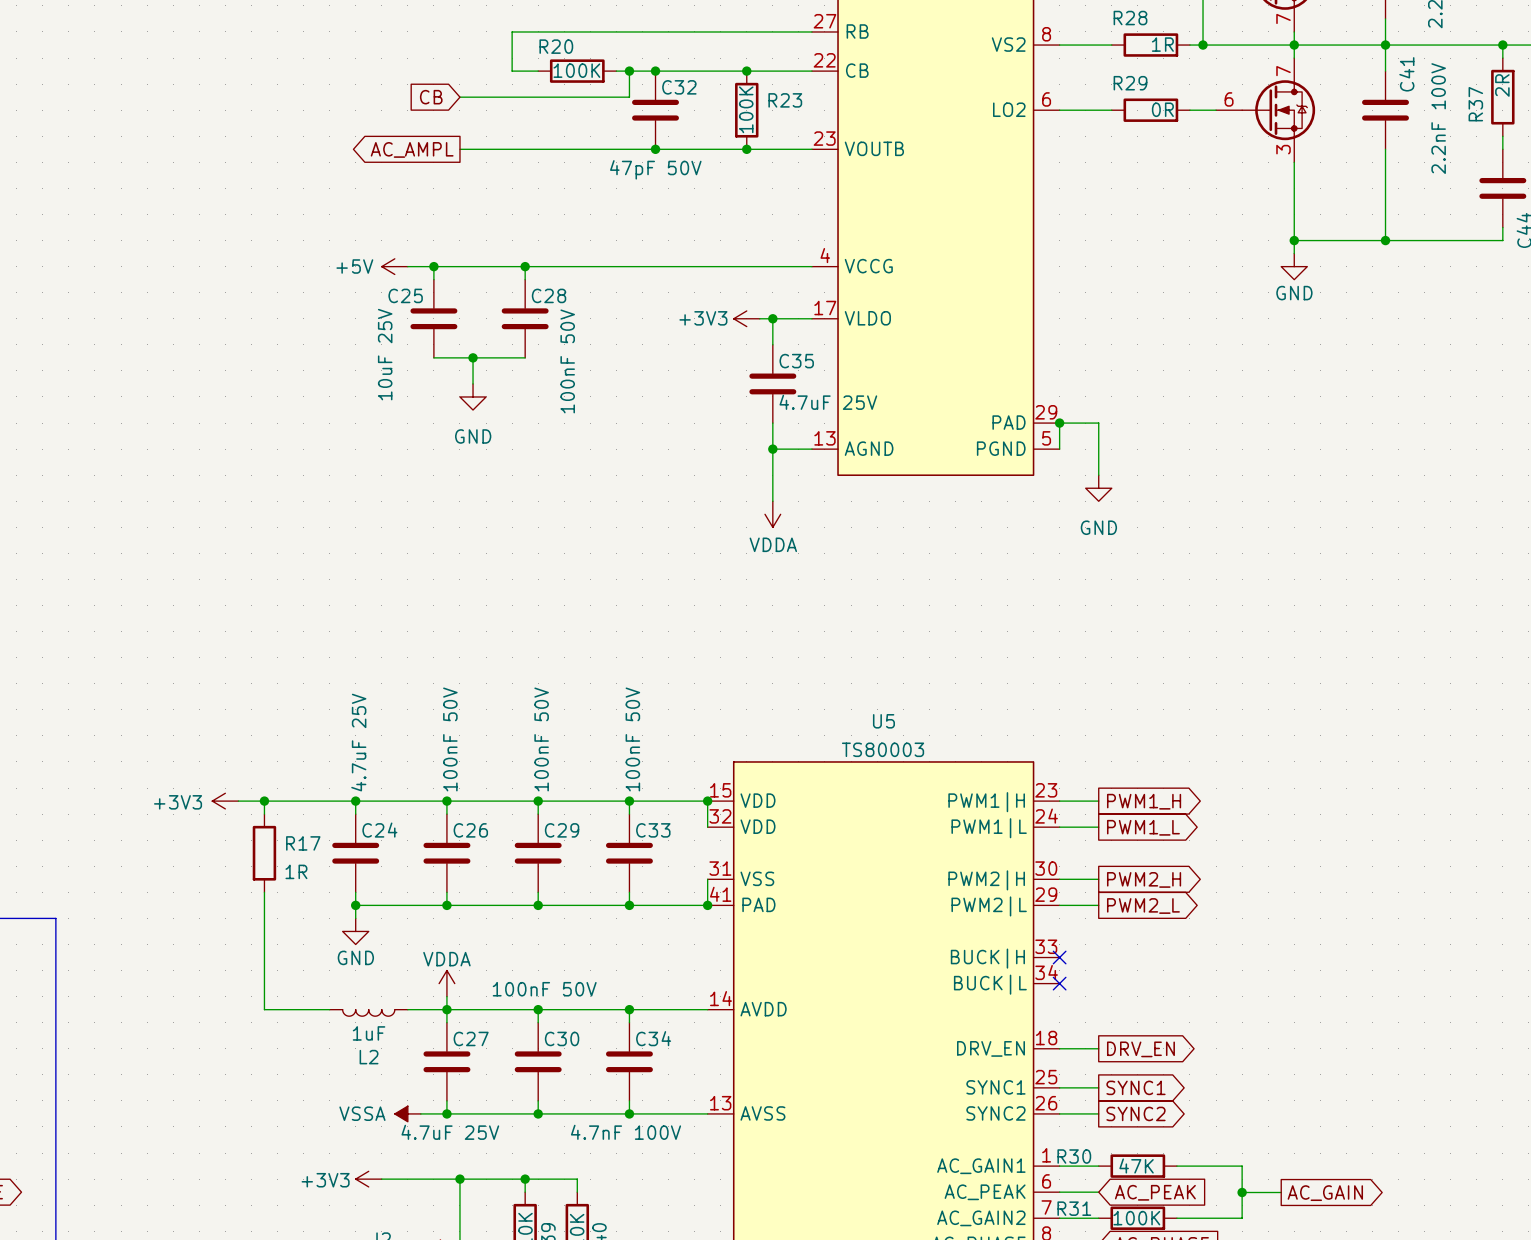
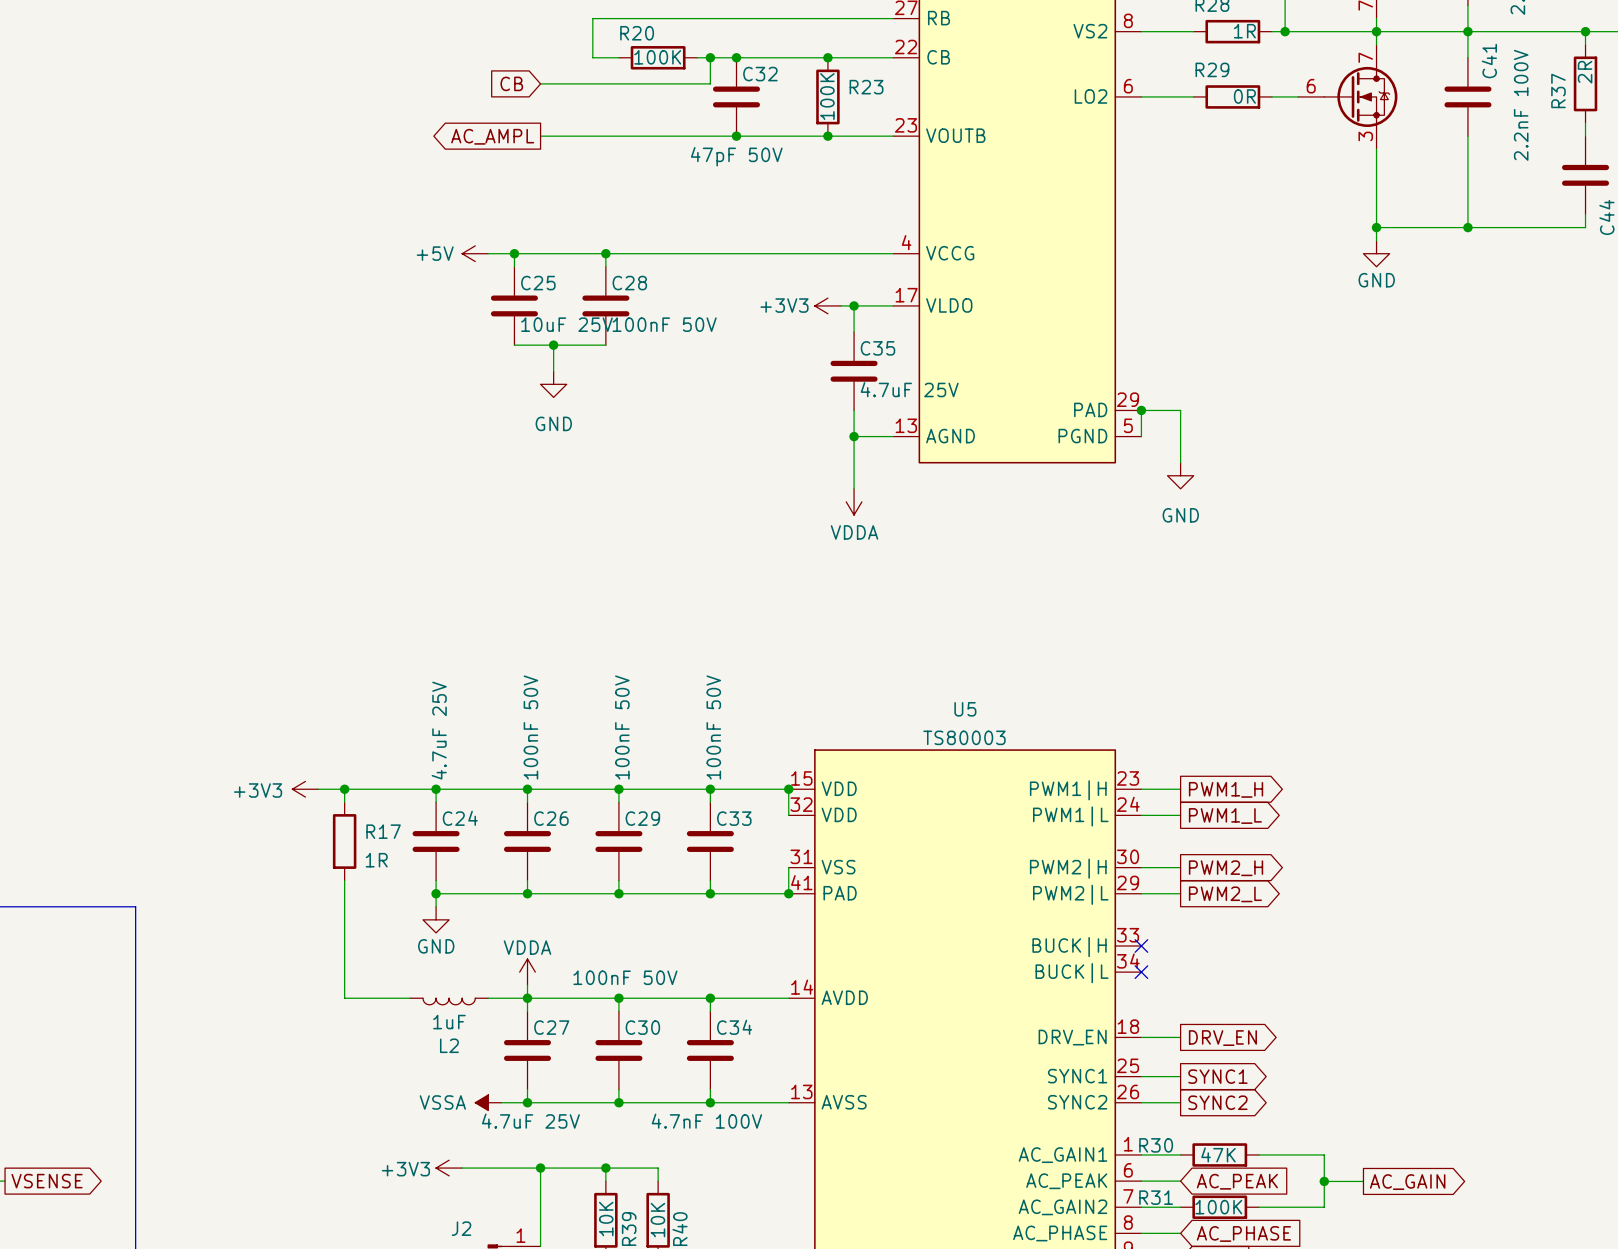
C25 name position: C25 (405, 295) -> C25 (538, 283)
C25 value rotation: 0° (385, 354) -> 90° clockwise (566, 324)
C28 value rotation: 0° (567, 361) -> 90° clockwise (664, 324)

